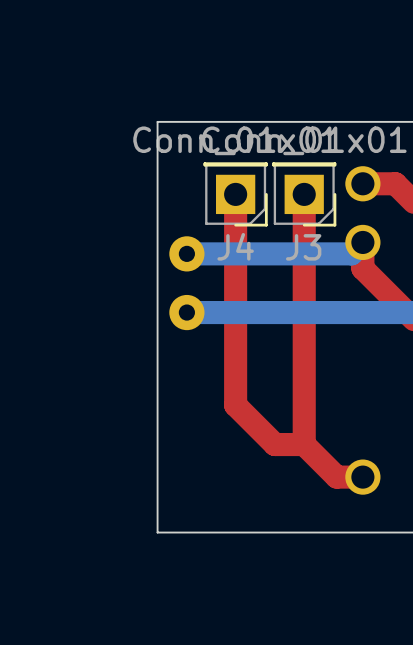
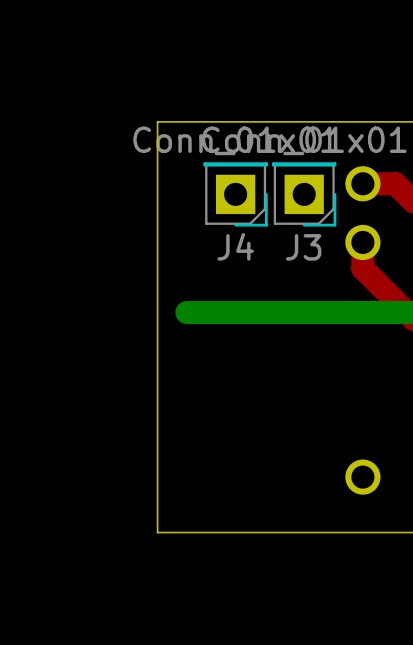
top track: (235, 194) (235, 405) (274, 444) (304, 444) -> none
top track: (304, 194) (304, 444) -> none
bottom track: (362, 242) (351, 253) (186, 253) -> none
part: (186, 283) -> none
top track: (304, 444) (336, 477) (362, 477) -> none

